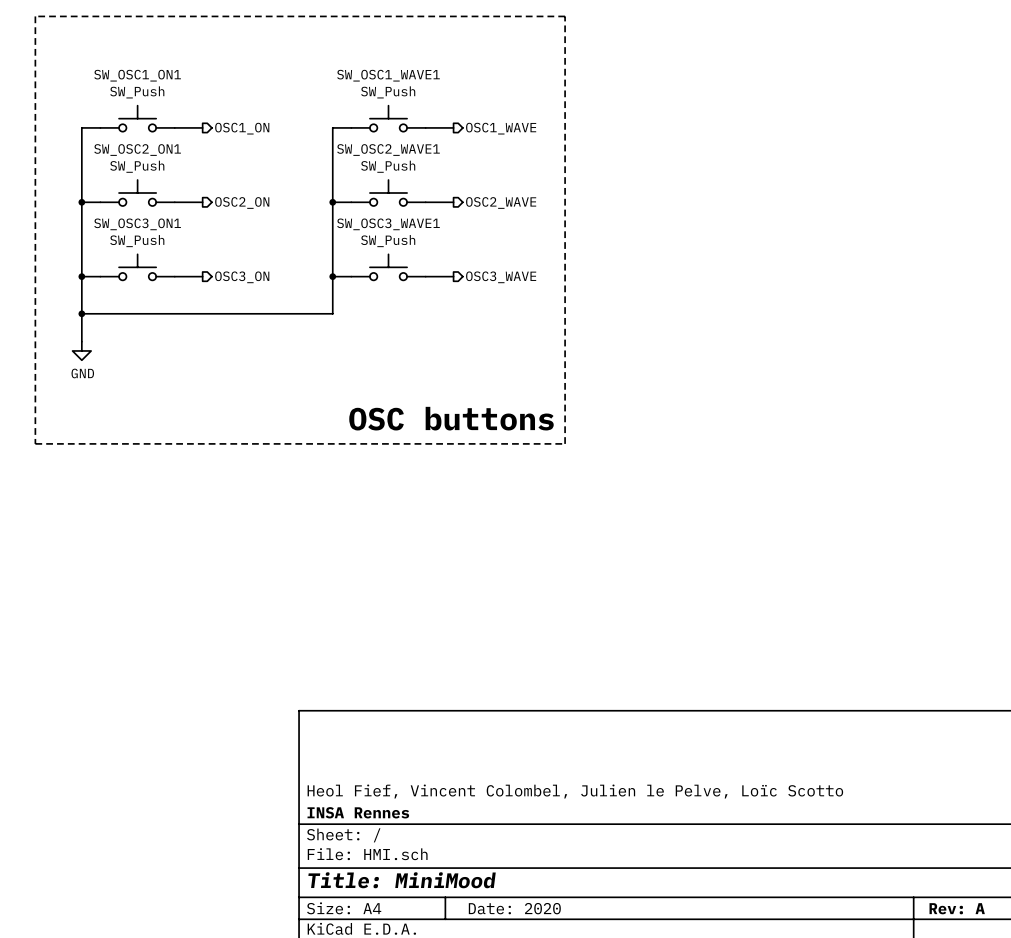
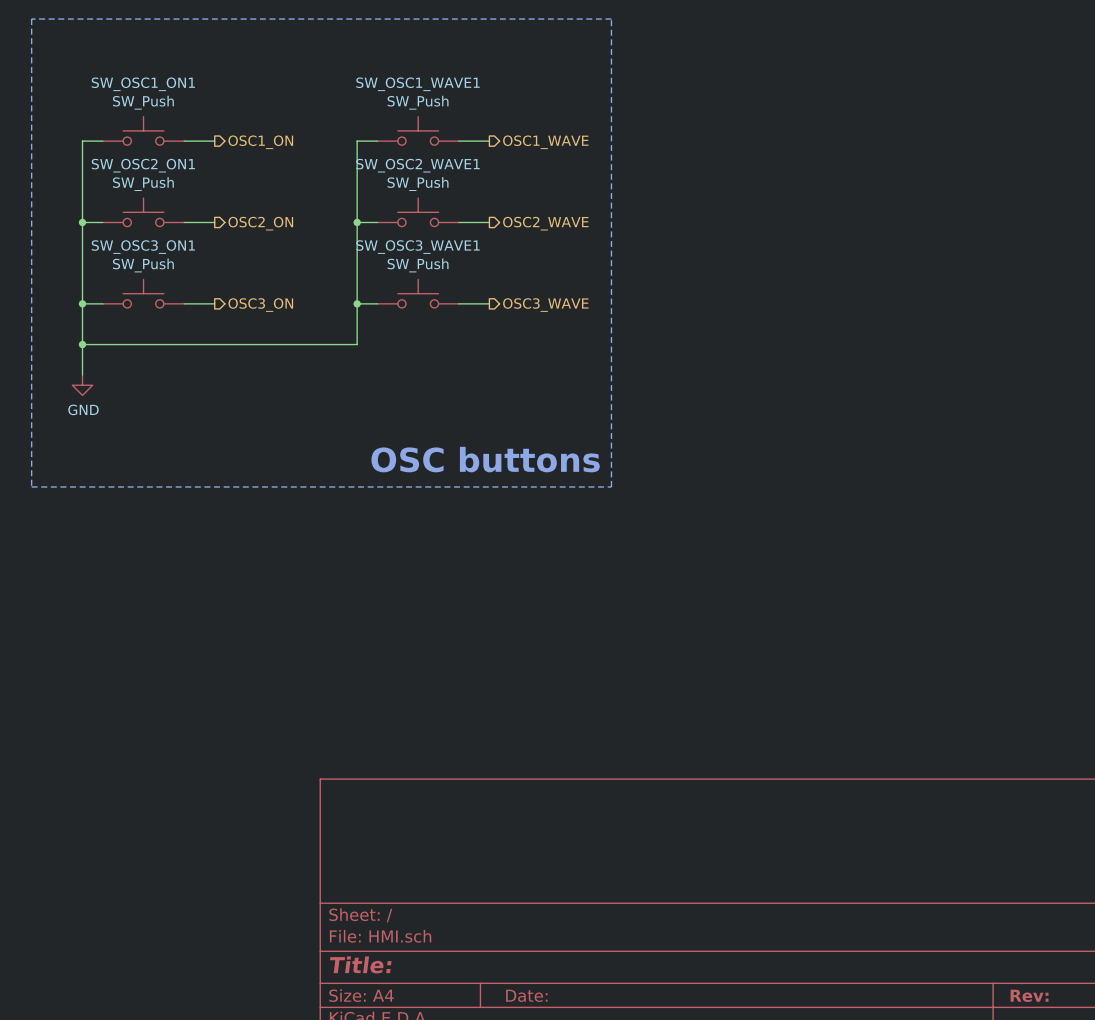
title block: Heol Fief, Vincent Colombel, Julien le Pelve, Loïc Scotto (575, 791) -> none
title block: INSA Rennes (358, 812) -> none
title block: Title: MiniMood (402, 880) -> Title: (360, 964)
title block: Date: 2020 (514, 908) -> Date: (526, 995)
title block: Rev: A (957, 908) -> Rev: (1029, 995)

